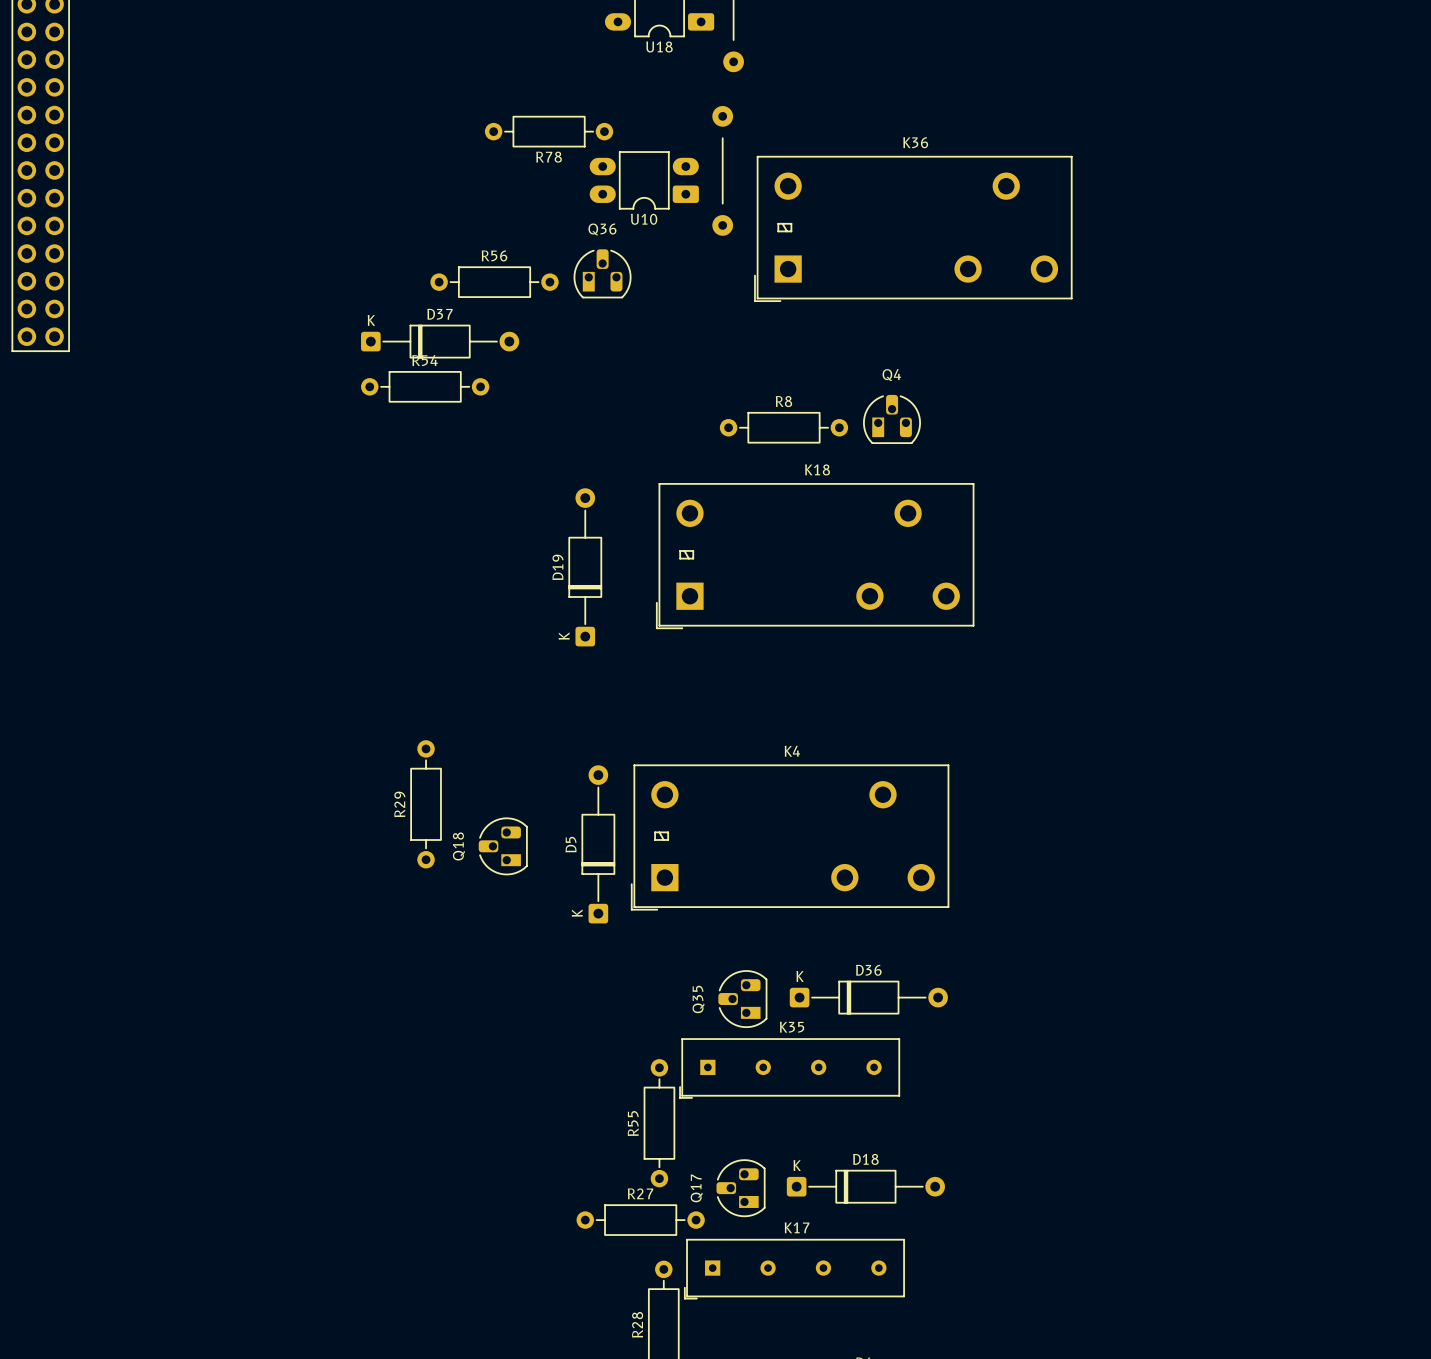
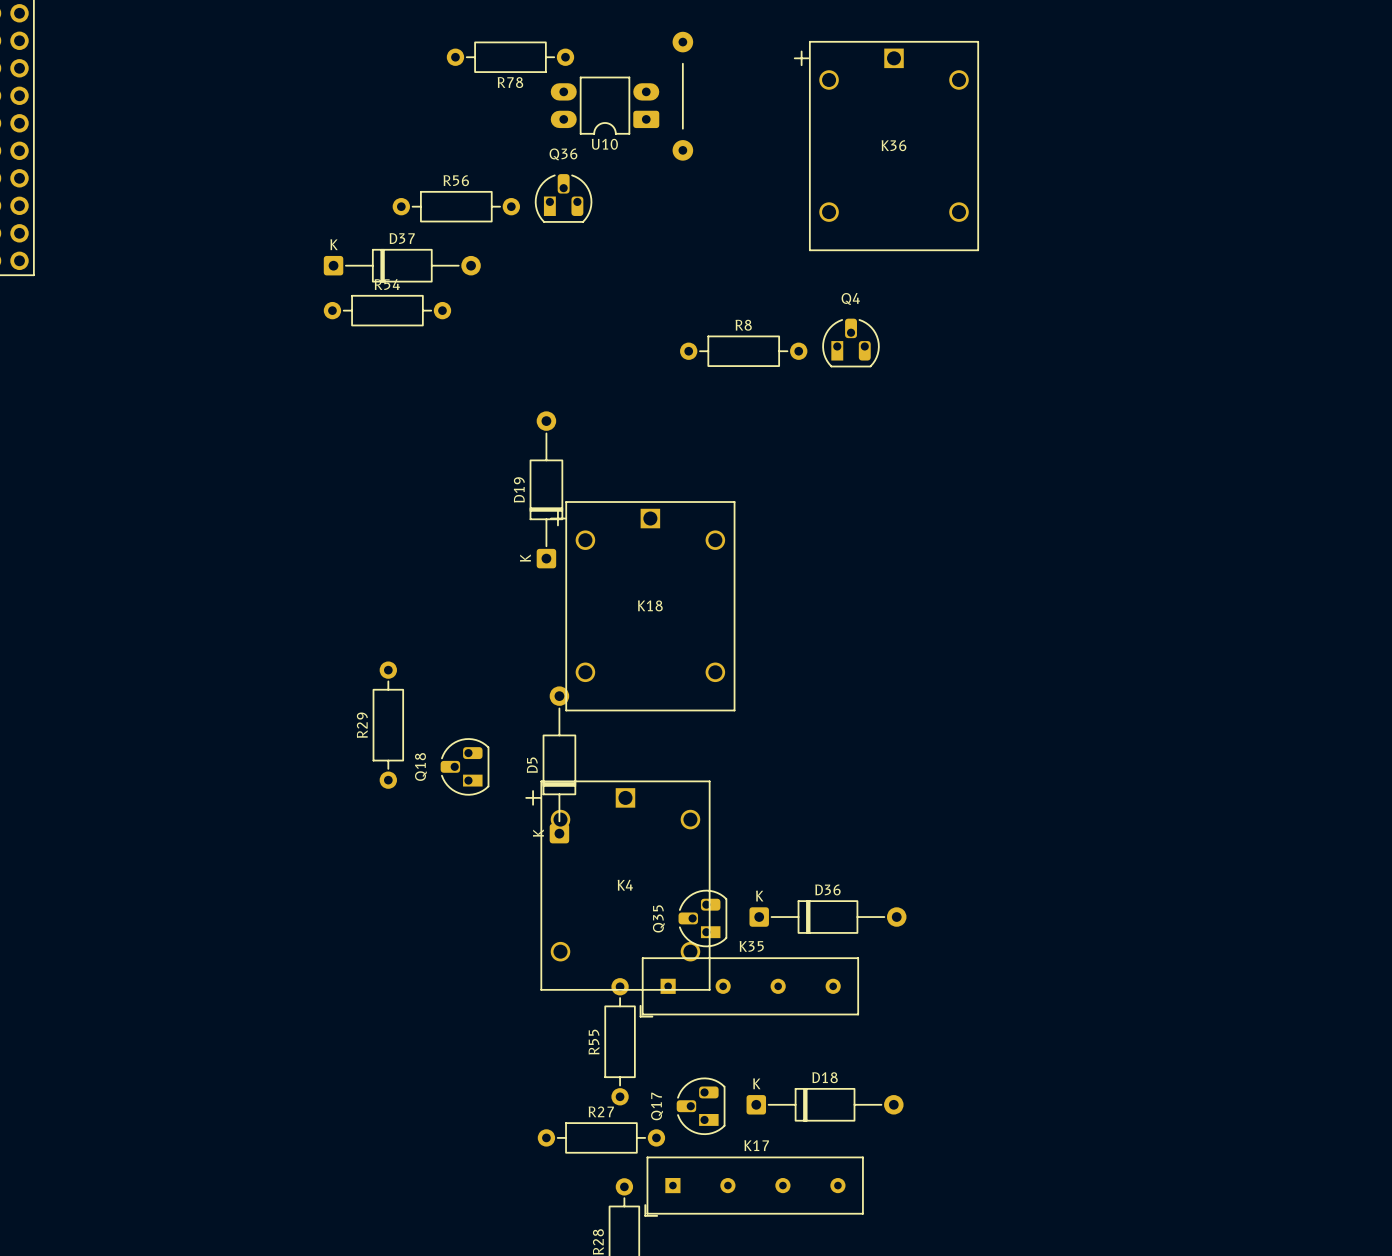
K36 name position: K36 (915, 142) -> K36 (893, 145)
K36 footprint: [754, 156, 1073, 302] -> [793, 40, 980, 252]
K18 name position: K18 (817, 469) -> K18 (650, 605)
K18 footprint: [656, 483, 975, 629] -> [550, 501, 736, 712]
K4 name position: K4 (792, 751) -> K4 (625, 885)
K4 footprint: [631, 764, 950, 911] -> [525, 780, 711, 991]

